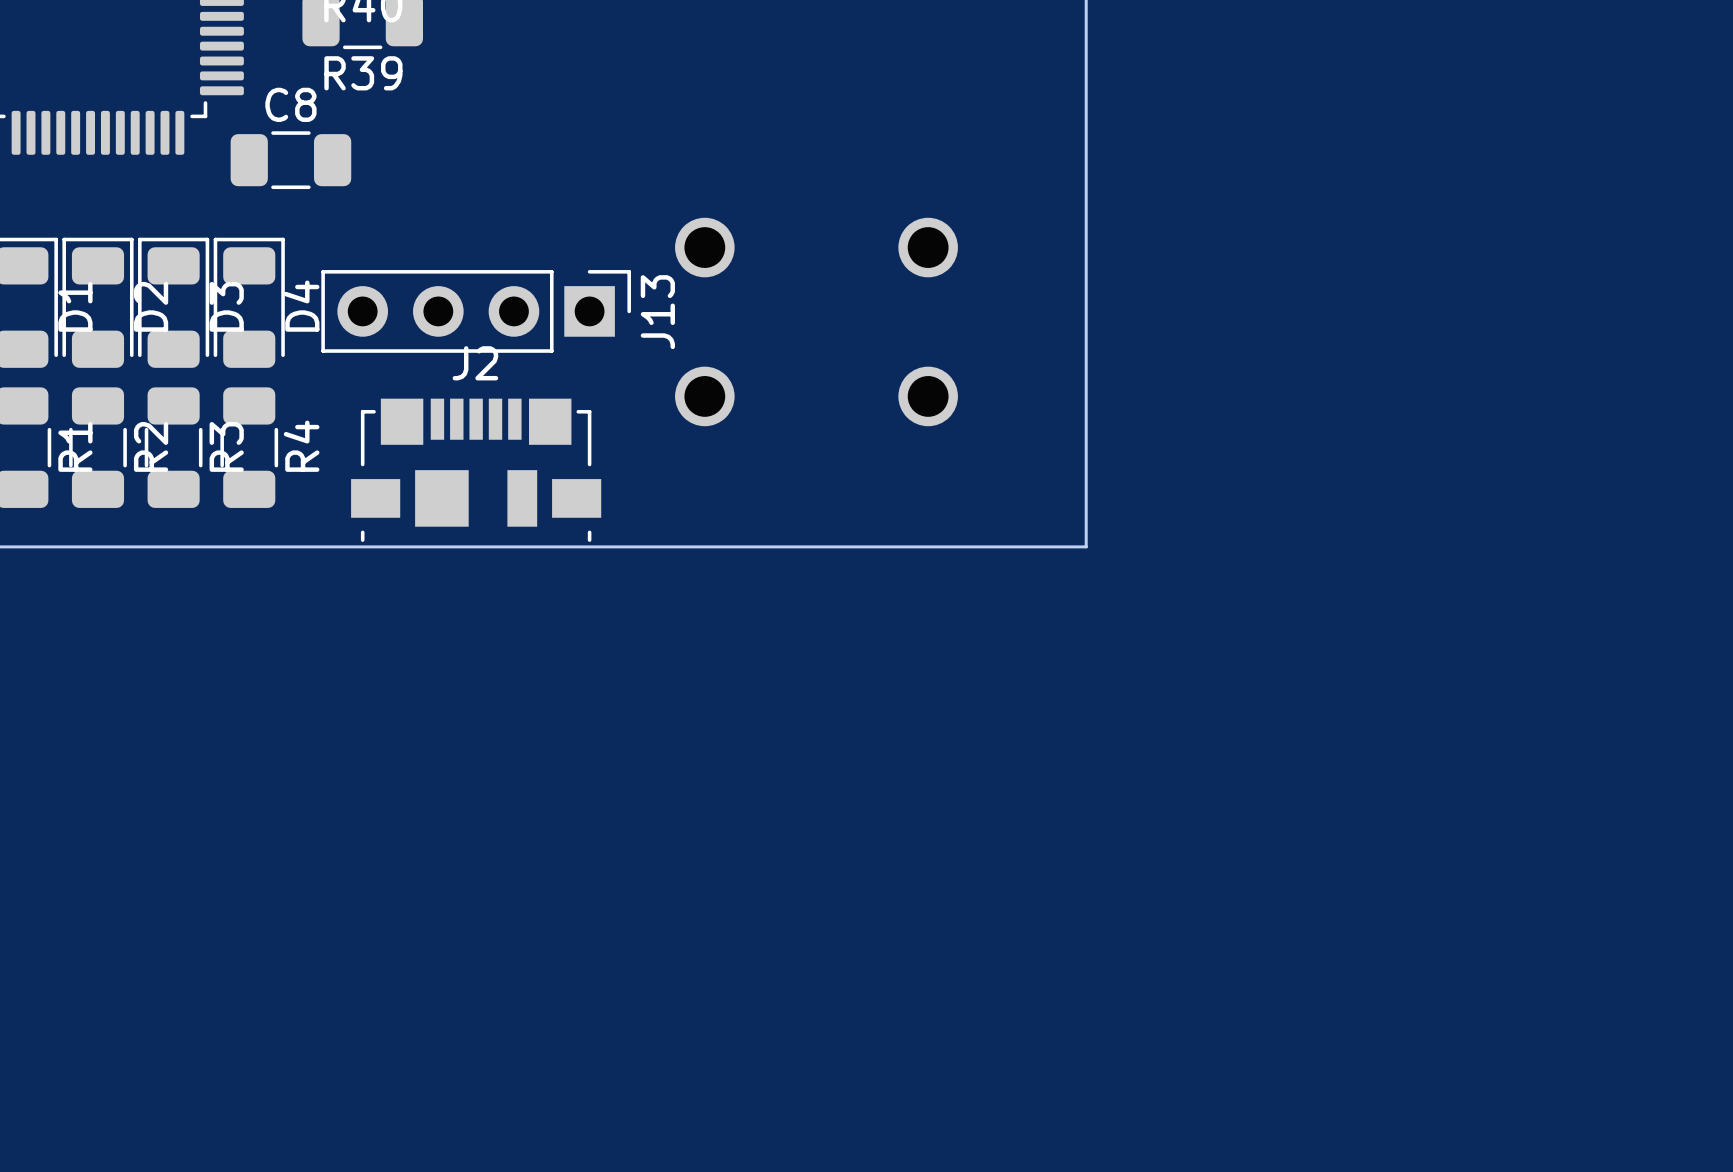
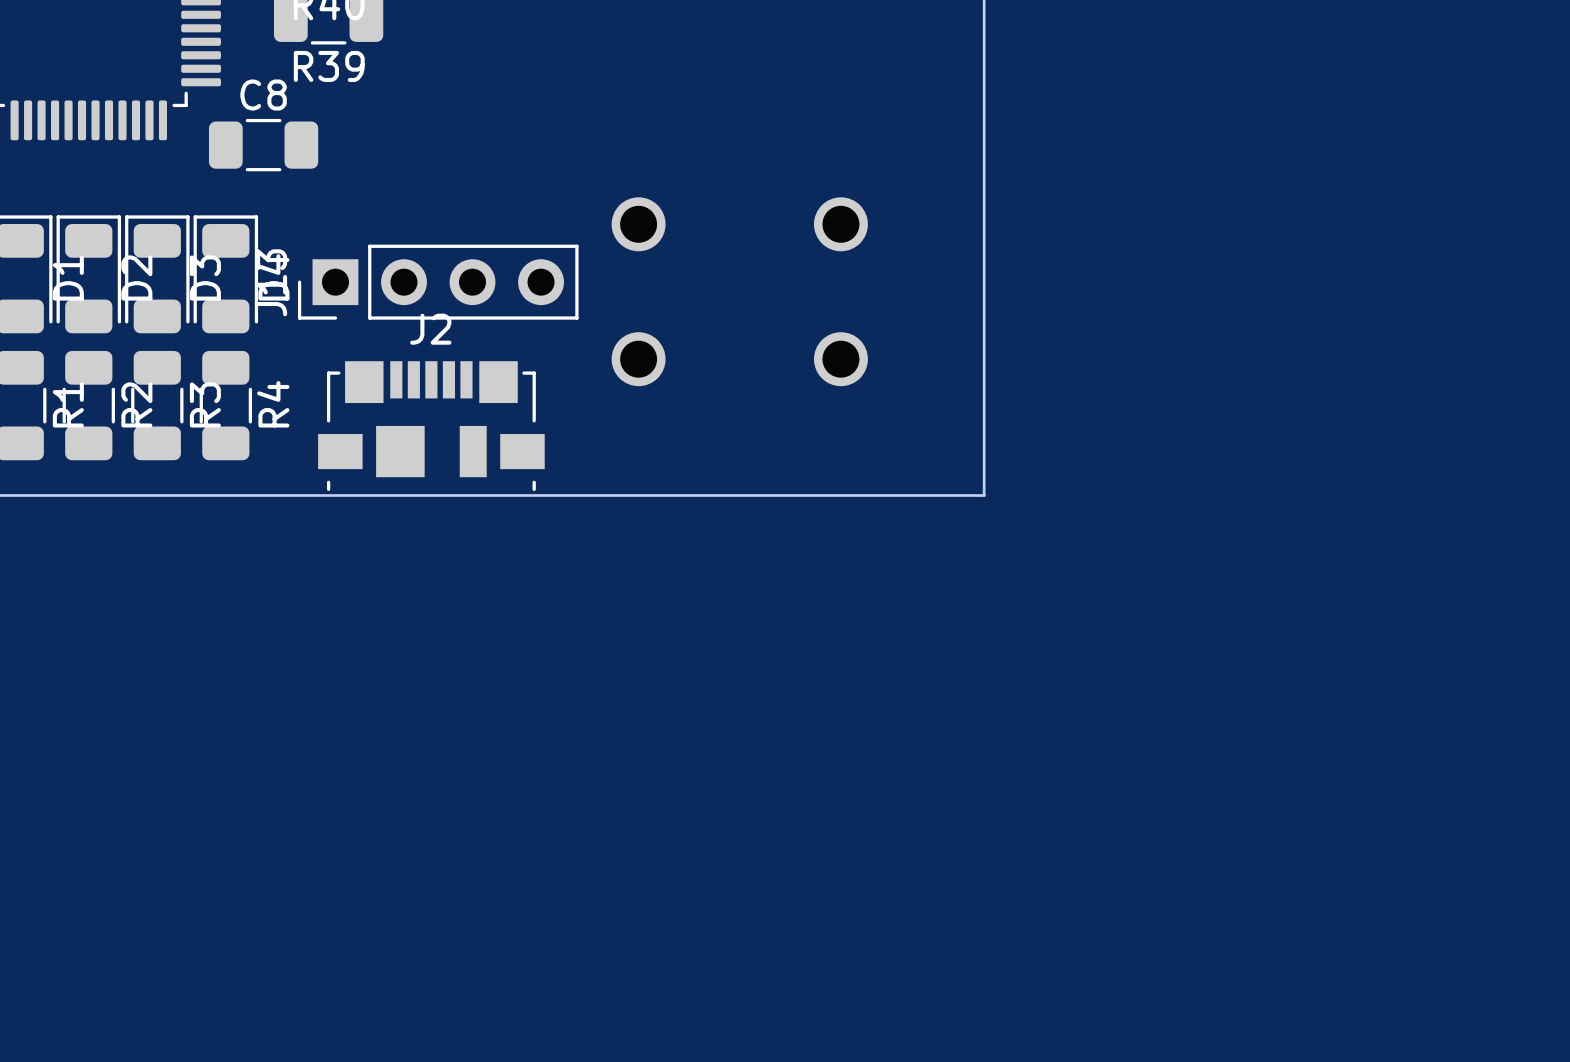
J13 rotation: 0° (476, 311) -> 180° (438, 282)

